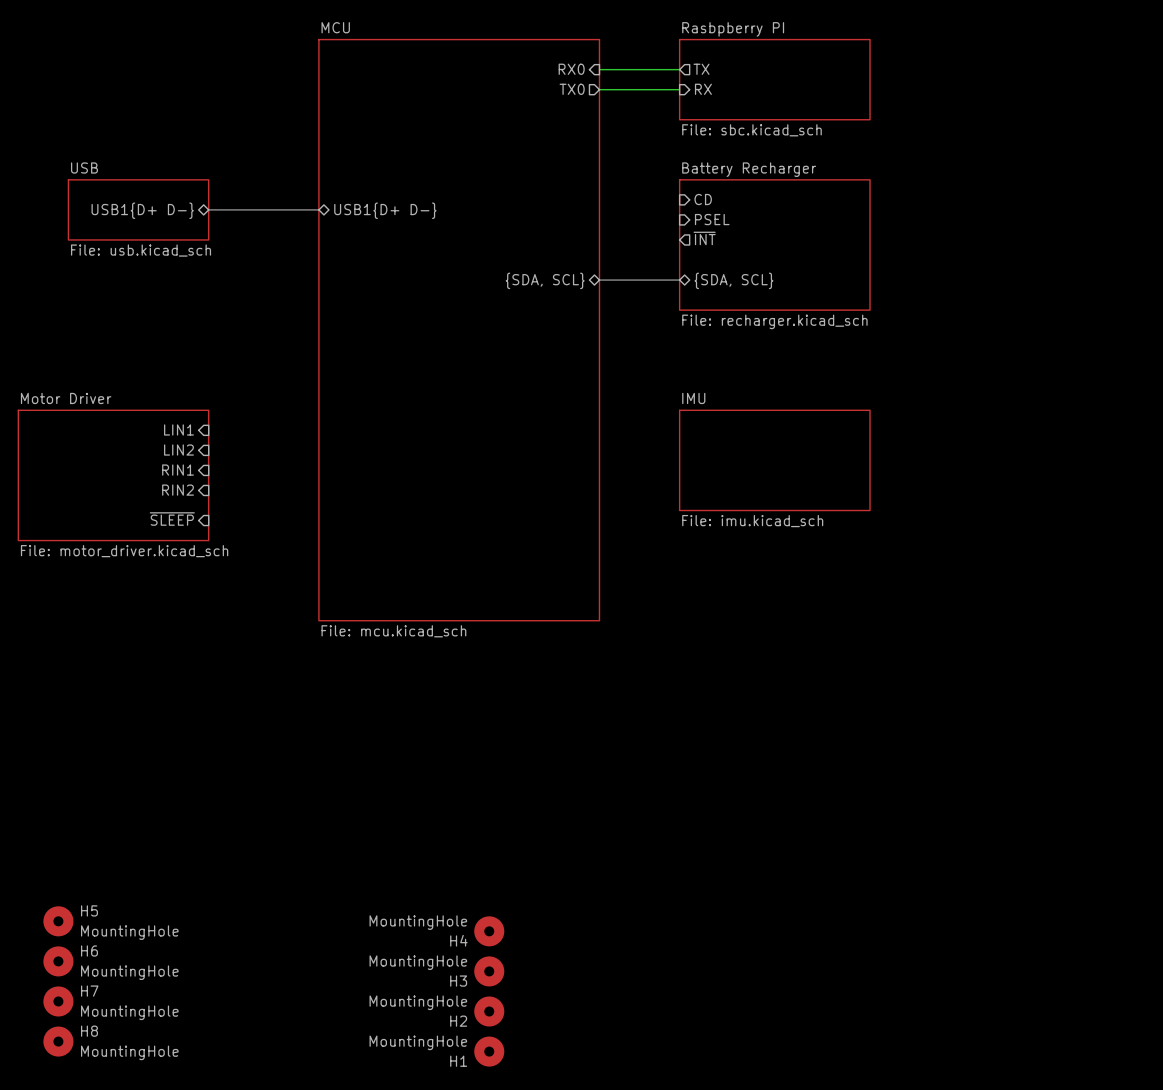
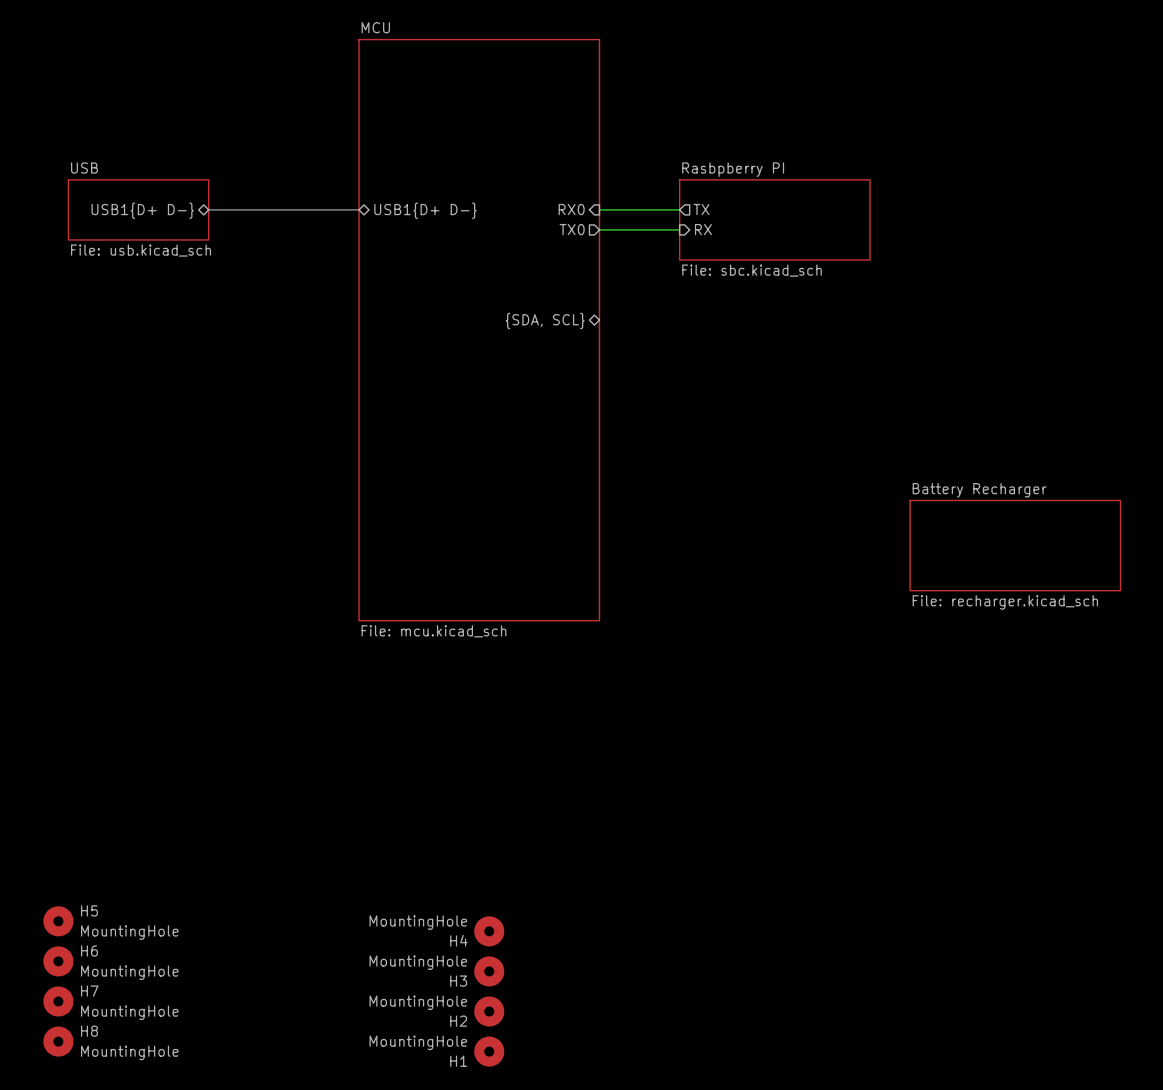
sheet pin position: RX0 (571, 69) -> RX0 (571, 209)
wire: (599, 69) (679, 69) -> (599, 209) (679, 209)
sheet pin position: TX (701, 69) -> TX (701, 209)
sheet Rasbpberry PI position: (774, 79) -> (774, 219)
sheet pin position: TX0 (572, 89) -> TX0 (572, 229)
wire: (599, 89) (679, 89) -> (599, 229) (679, 229)
sheet pin position: RX (703, 89) -> RX (703, 229)
sheet pin: CD (703, 199) -> none
bus: none -> (318, 209) (359, 209)
sheet pin position: USB1{D+ D-} (385, 210) -> USB1{D+ D-} (425, 210)
sheet pin: PSEL (712, 219) -> none
sheet pin: ~{INT} (704, 238) -> none
sheet Battery Recharger: File: recharger.kicad_sch (774, 244) -> none
sheet pin position: {SDA, SCL} (545, 280) -> {SDA, SCL} (545, 320)
bus: (599, 280) (679, 280) -> none
sheet pin: {SDA, SCL} (733, 280) -> none
sheet MCU: File: mcu.kicad_sch (459, 330) -> none
sheet MCU: none -> File: mcu.kicad_sch (479, 330)
sheet pin: LIN1 (178, 429) -> none
sheet pin: LIN2 (178, 450) -> none
sheet IMU: File: imu.kicad_sch (774, 460) -> none
sheet pin: RIN1 (178, 470) -> none
sheet Motor Driver: File: motor_driver.kicad_sch (113, 475) -> none
sheet pin: RIN2 (178, 490) -> none
sheet pin: ~{SLEEP} (172, 519) -> none
sheet Battery Recharger: none -> File: recharger.kicad_sch (1015, 545)

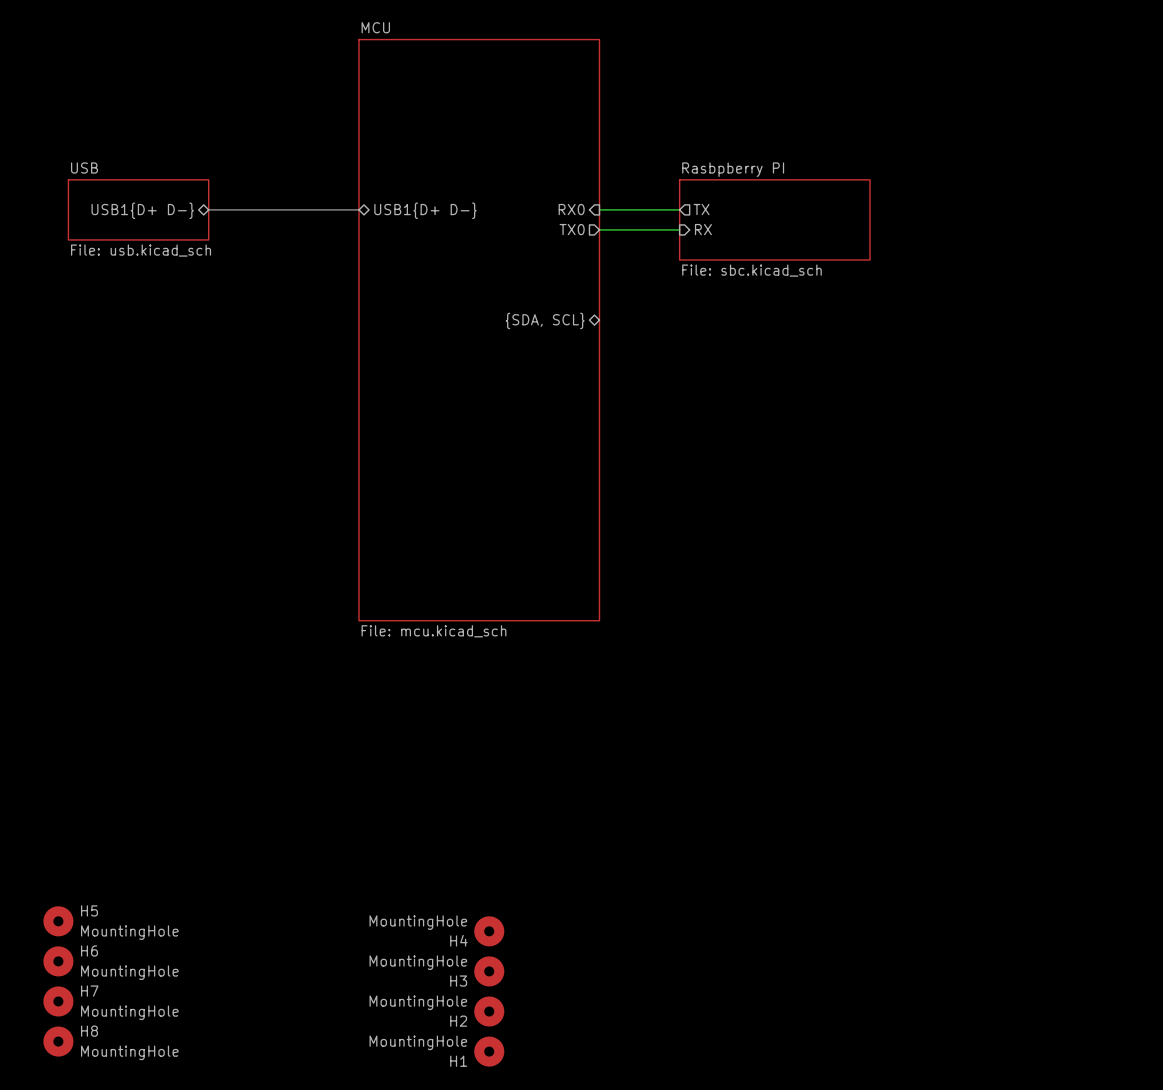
sheet Battery Recharger: File: recharger.kicad_sch (1015, 545) -> none

